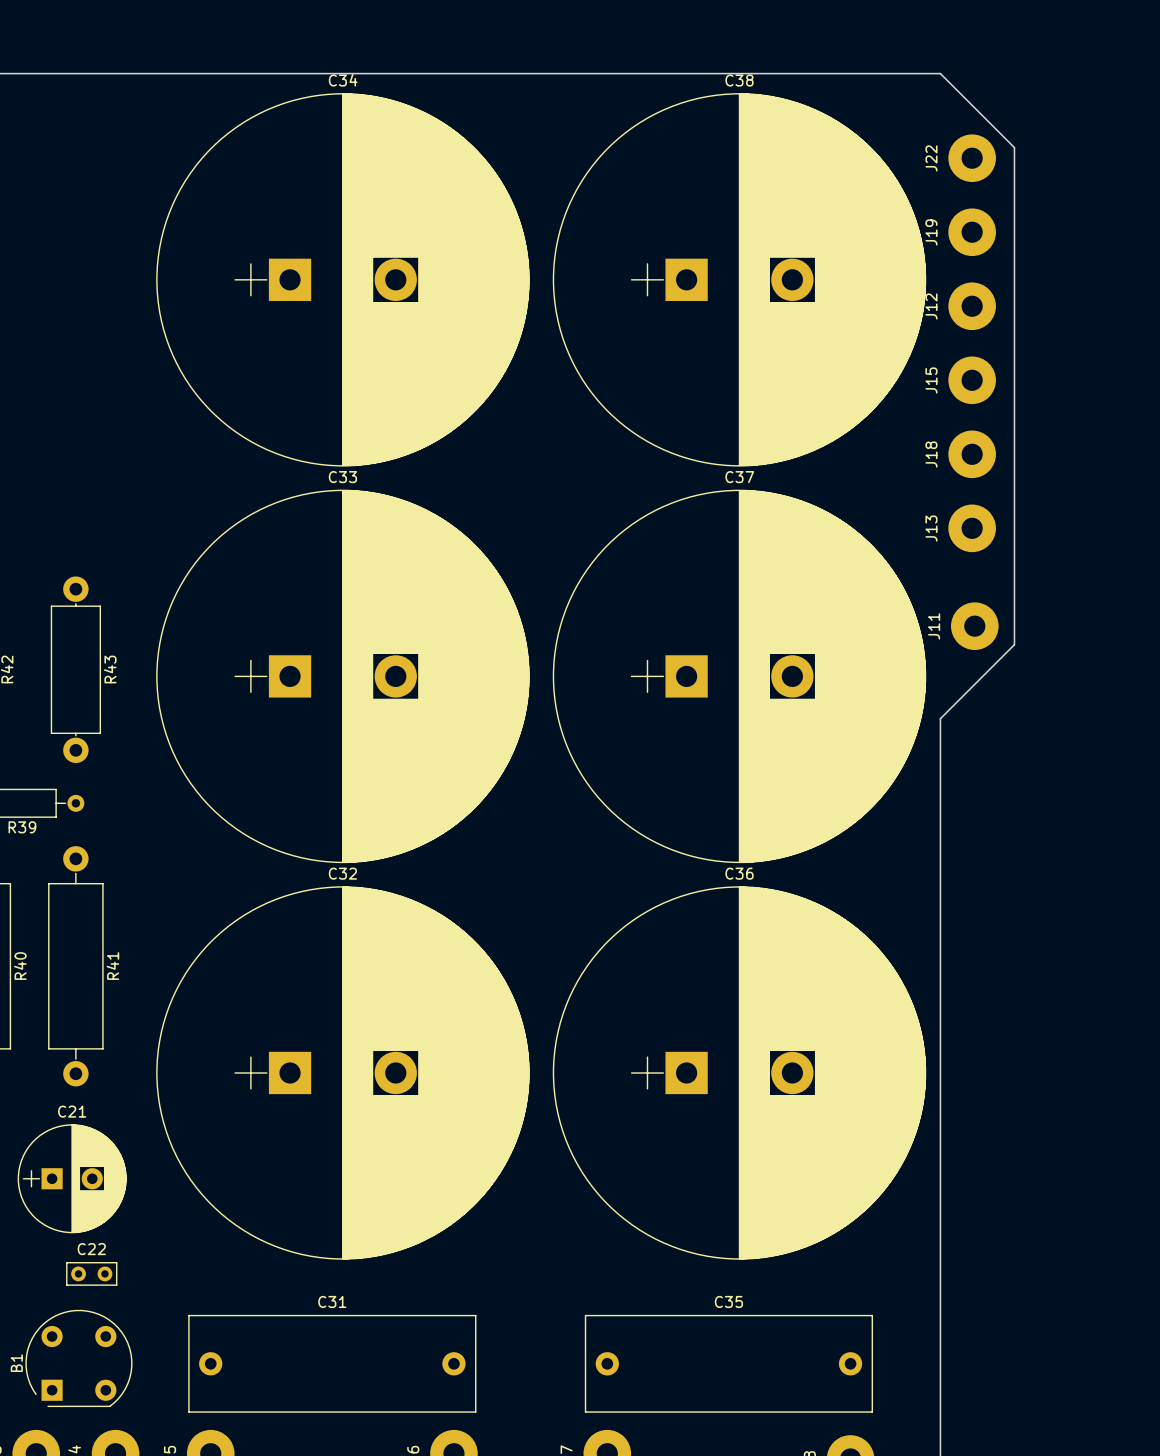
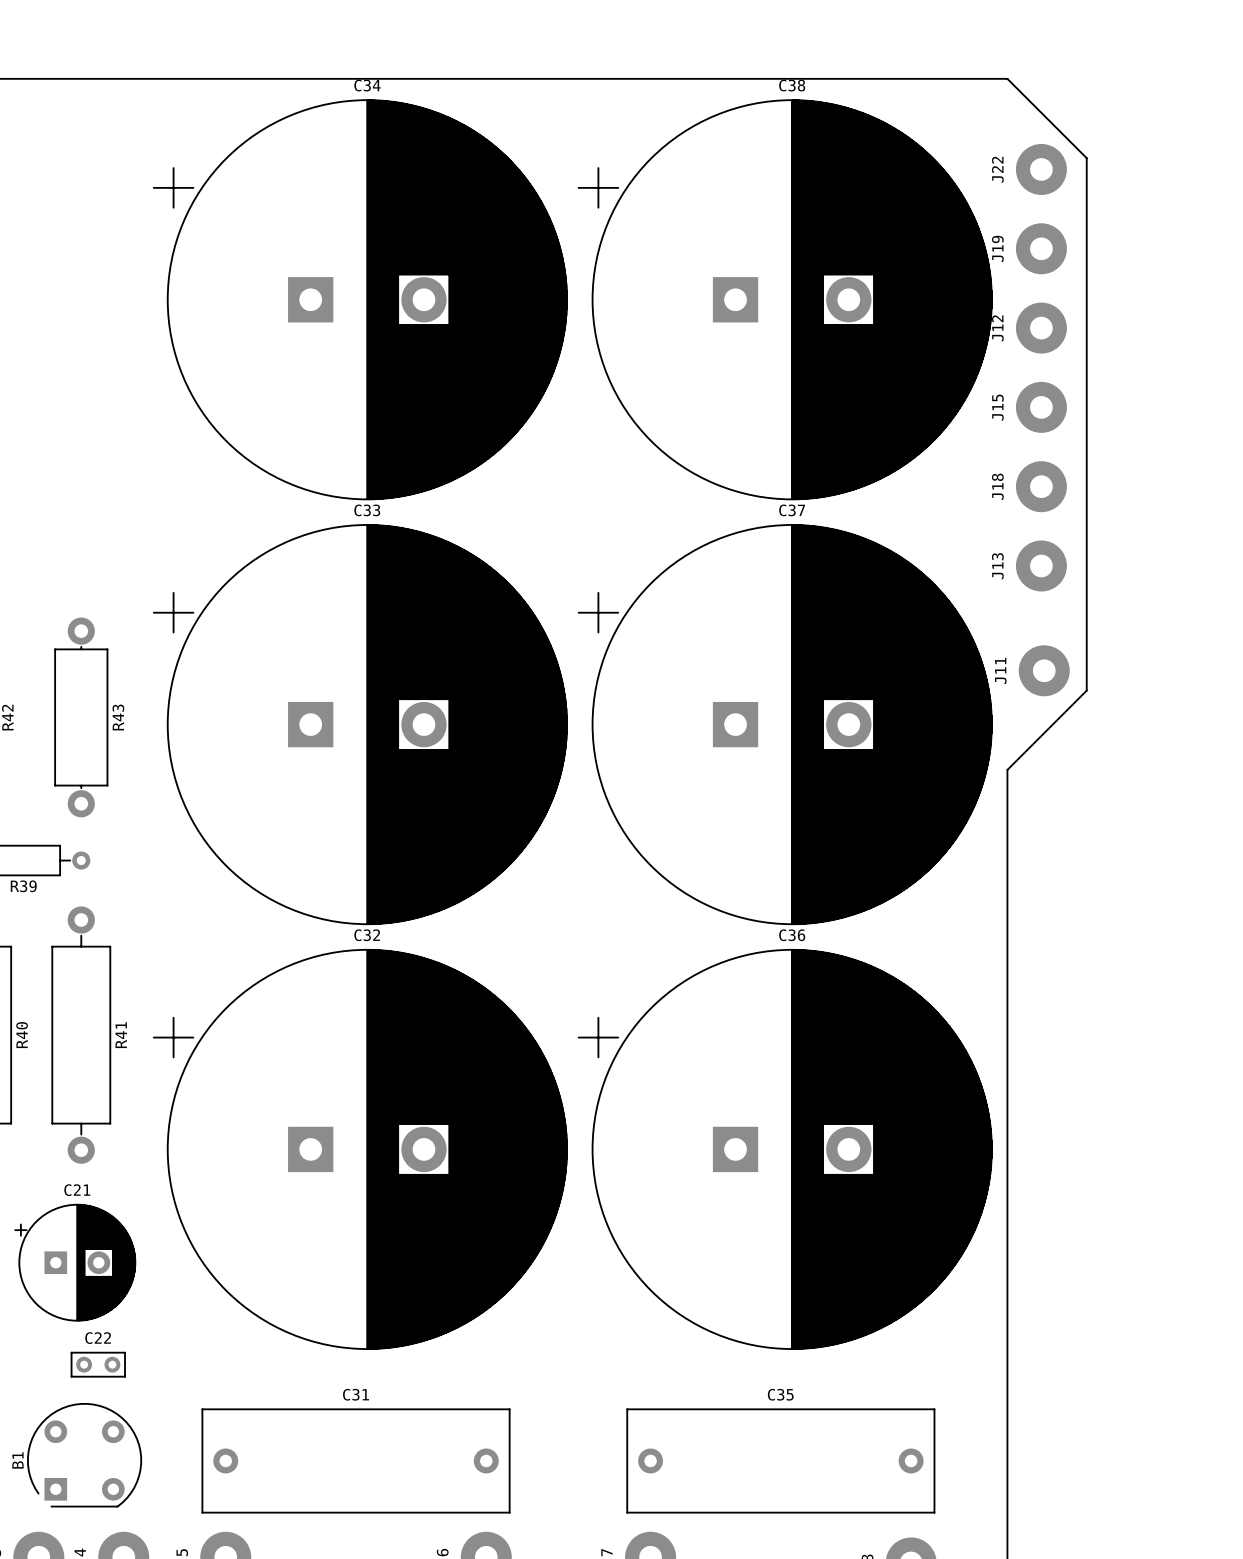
C34 footprint: [156, 93, 530, 467] -> [153, 99, 568, 501]
C38 footprint: [552, 93, 927, 467] -> [577, 99, 993, 501]
C33 footprint: [156, 489, 530, 864] -> [153, 524, 568, 925]
C37 footprint: [552, 489, 927, 864] -> [577, 524, 993, 925]
C32 footprint: [156, 886, 530, 1260] -> [153, 949, 568, 1350]
C36 footprint: [552, 886, 927, 1260] -> [577, 949, 993, 1350]
C21 footprint: [17, 1124, 127, 1234] -> [14, 1204, 137, 1322]

